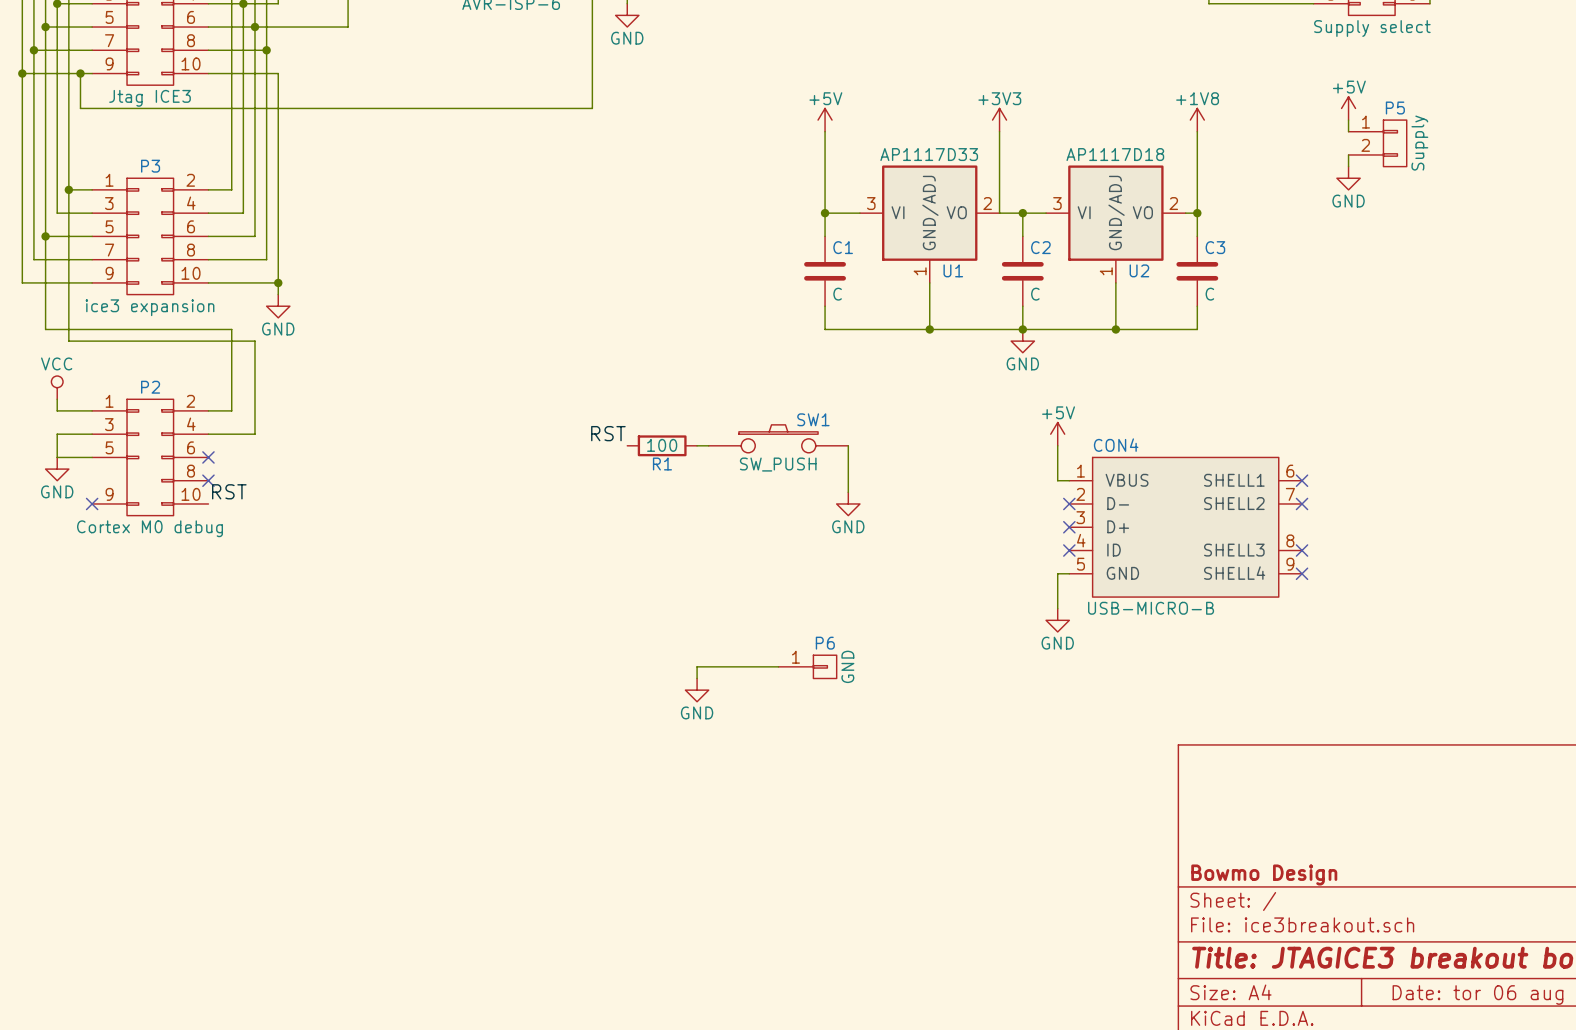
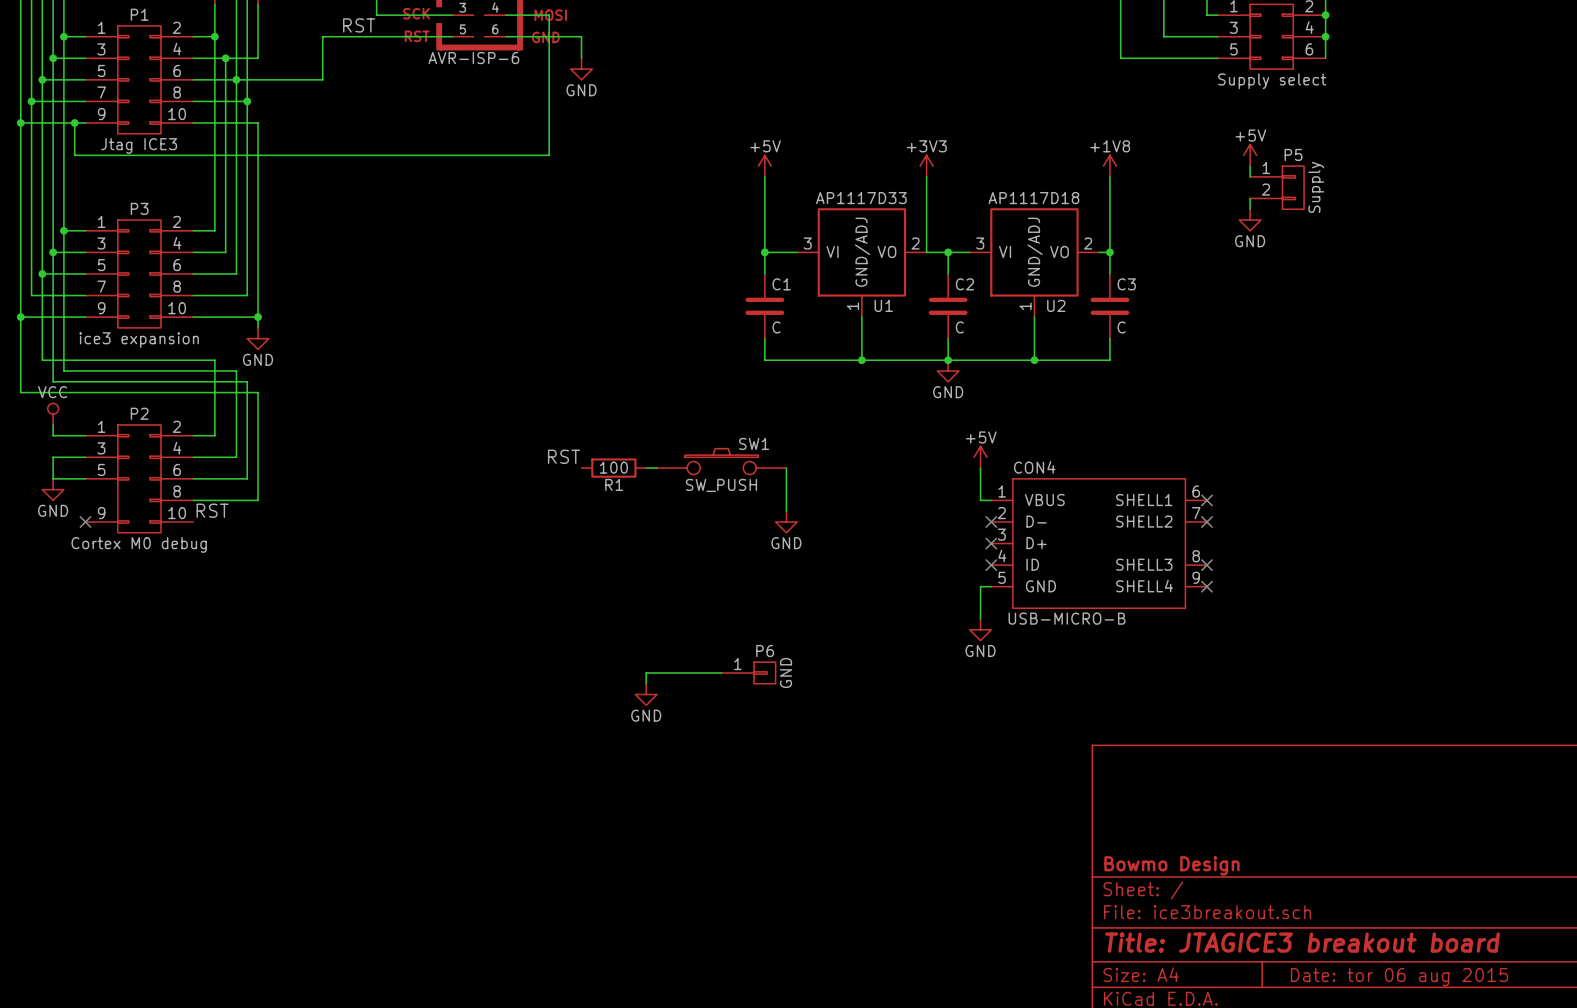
wire: none -> (53, 252) (53, 381) (247, 381) (247, 478) (193, 478)
junction: none -> (53, 252)
wire: none -> (20, 317) (20, 392) (258, 392) (258, 500) (193, 500)
junction: none -> (20, 317)
no-connect mark: (208, 457) -> none
no-connect mark: (208, 480) -> none

